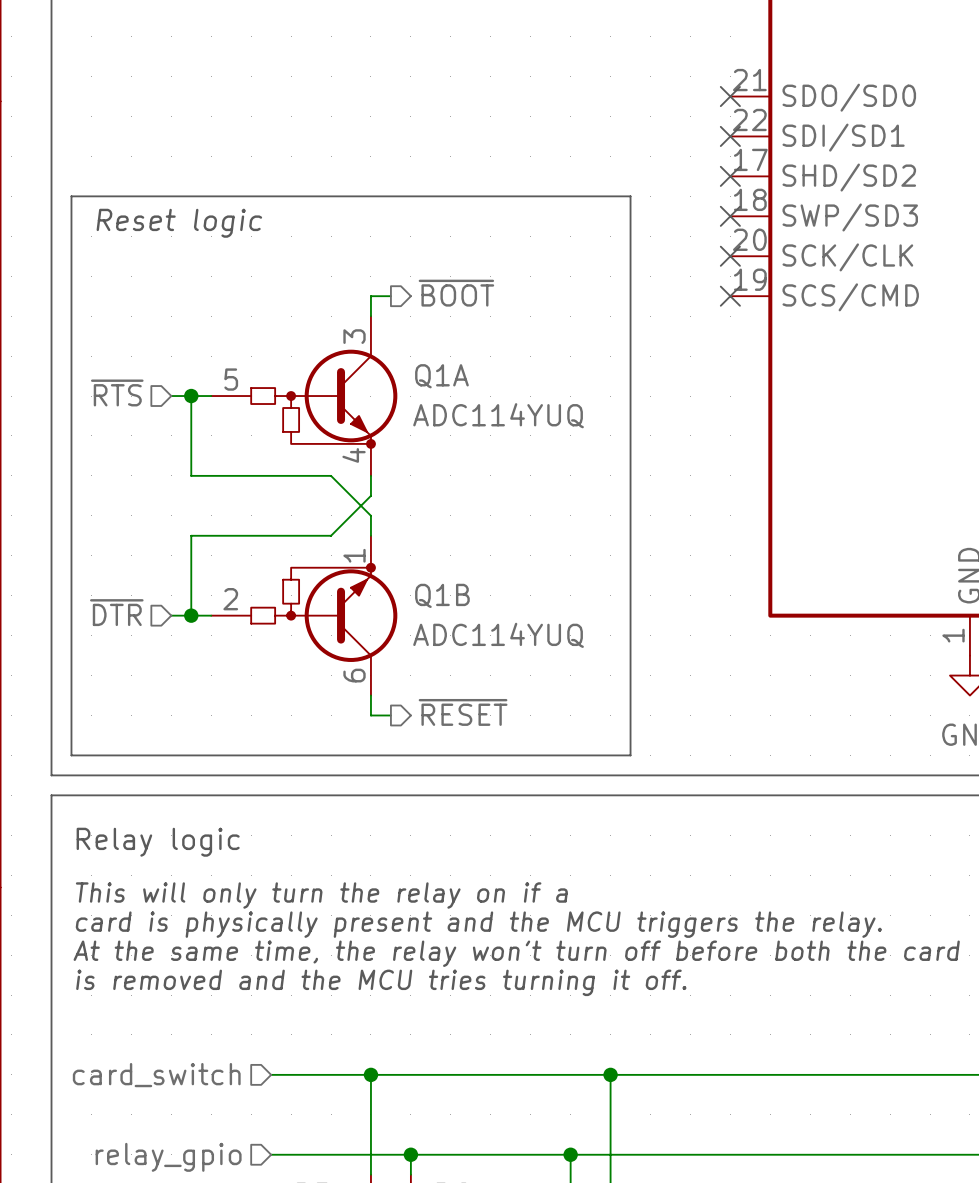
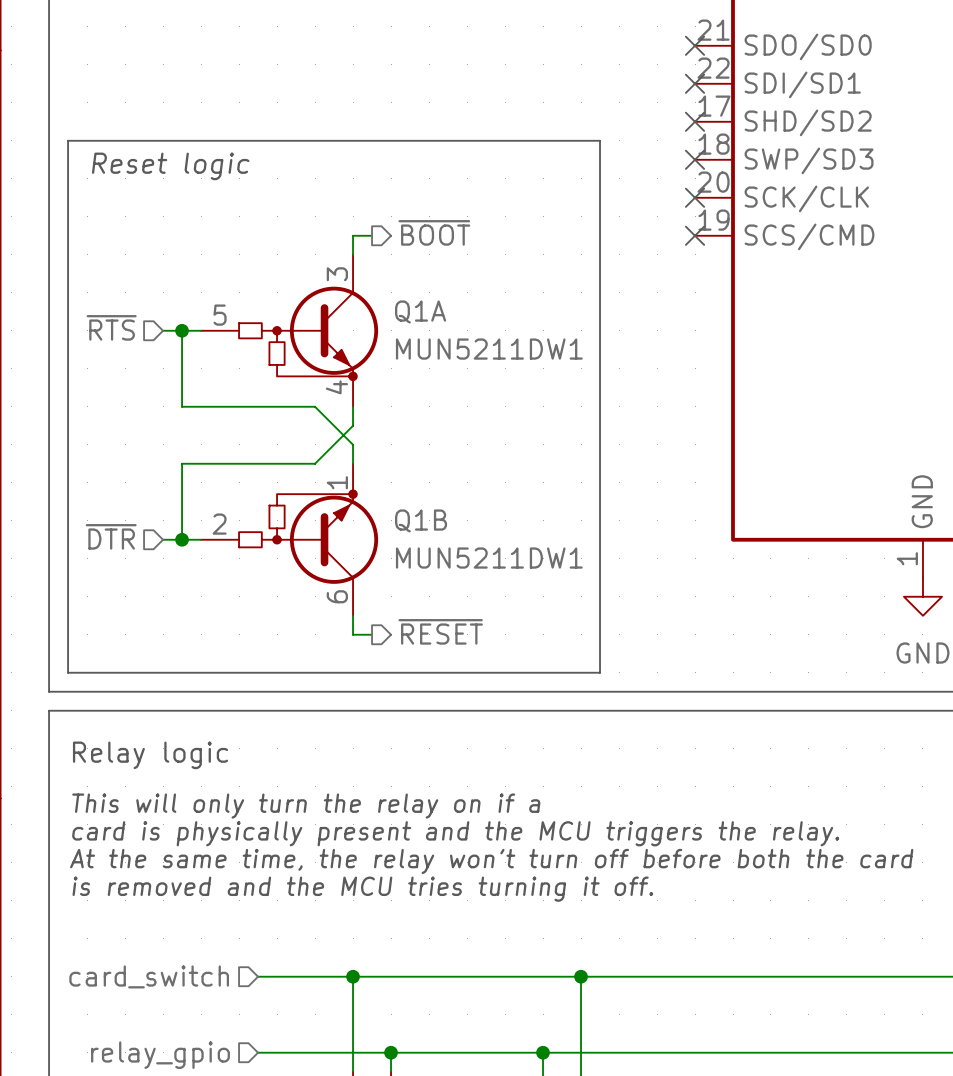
Q1A value: ADC114YUQ (498, 415) -> MUN5211DW1 (489, 349)
Q1B value: ADC114YUQ (498, 635) -> MUN5211DW1 (489, 558)

